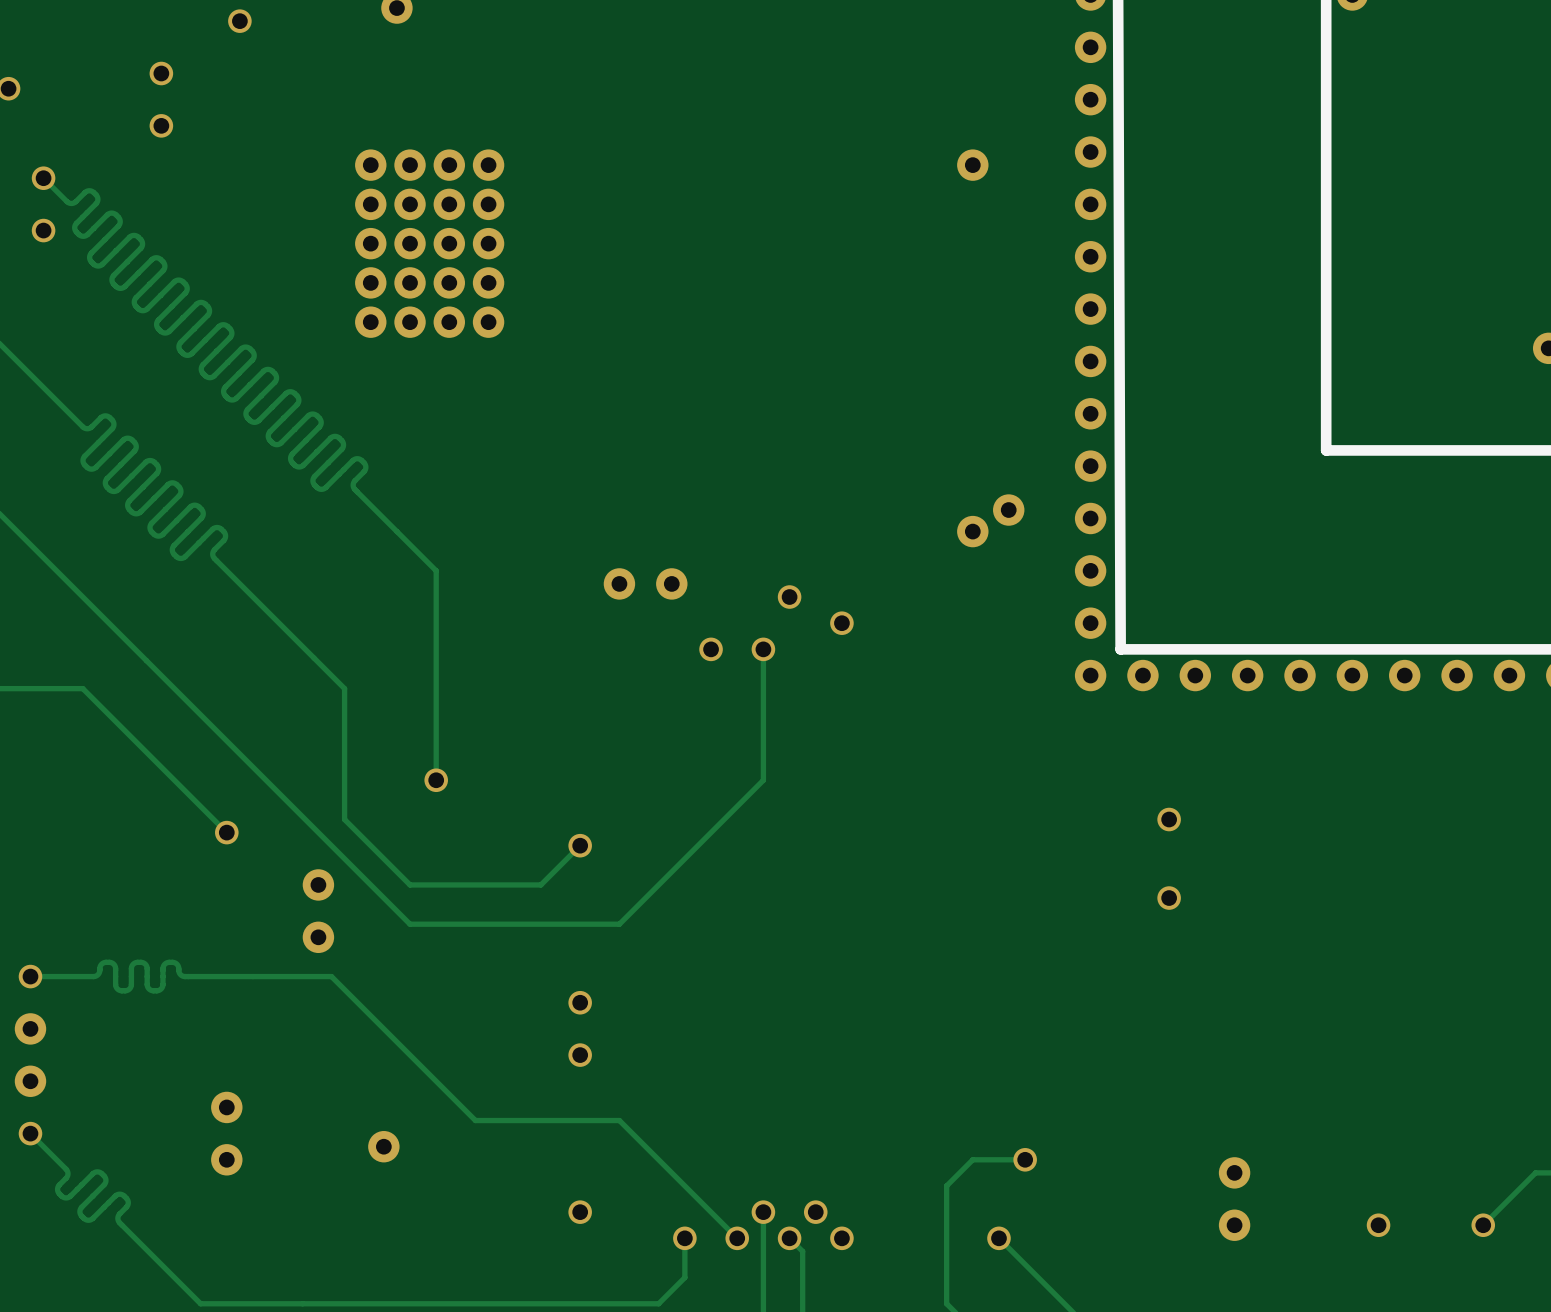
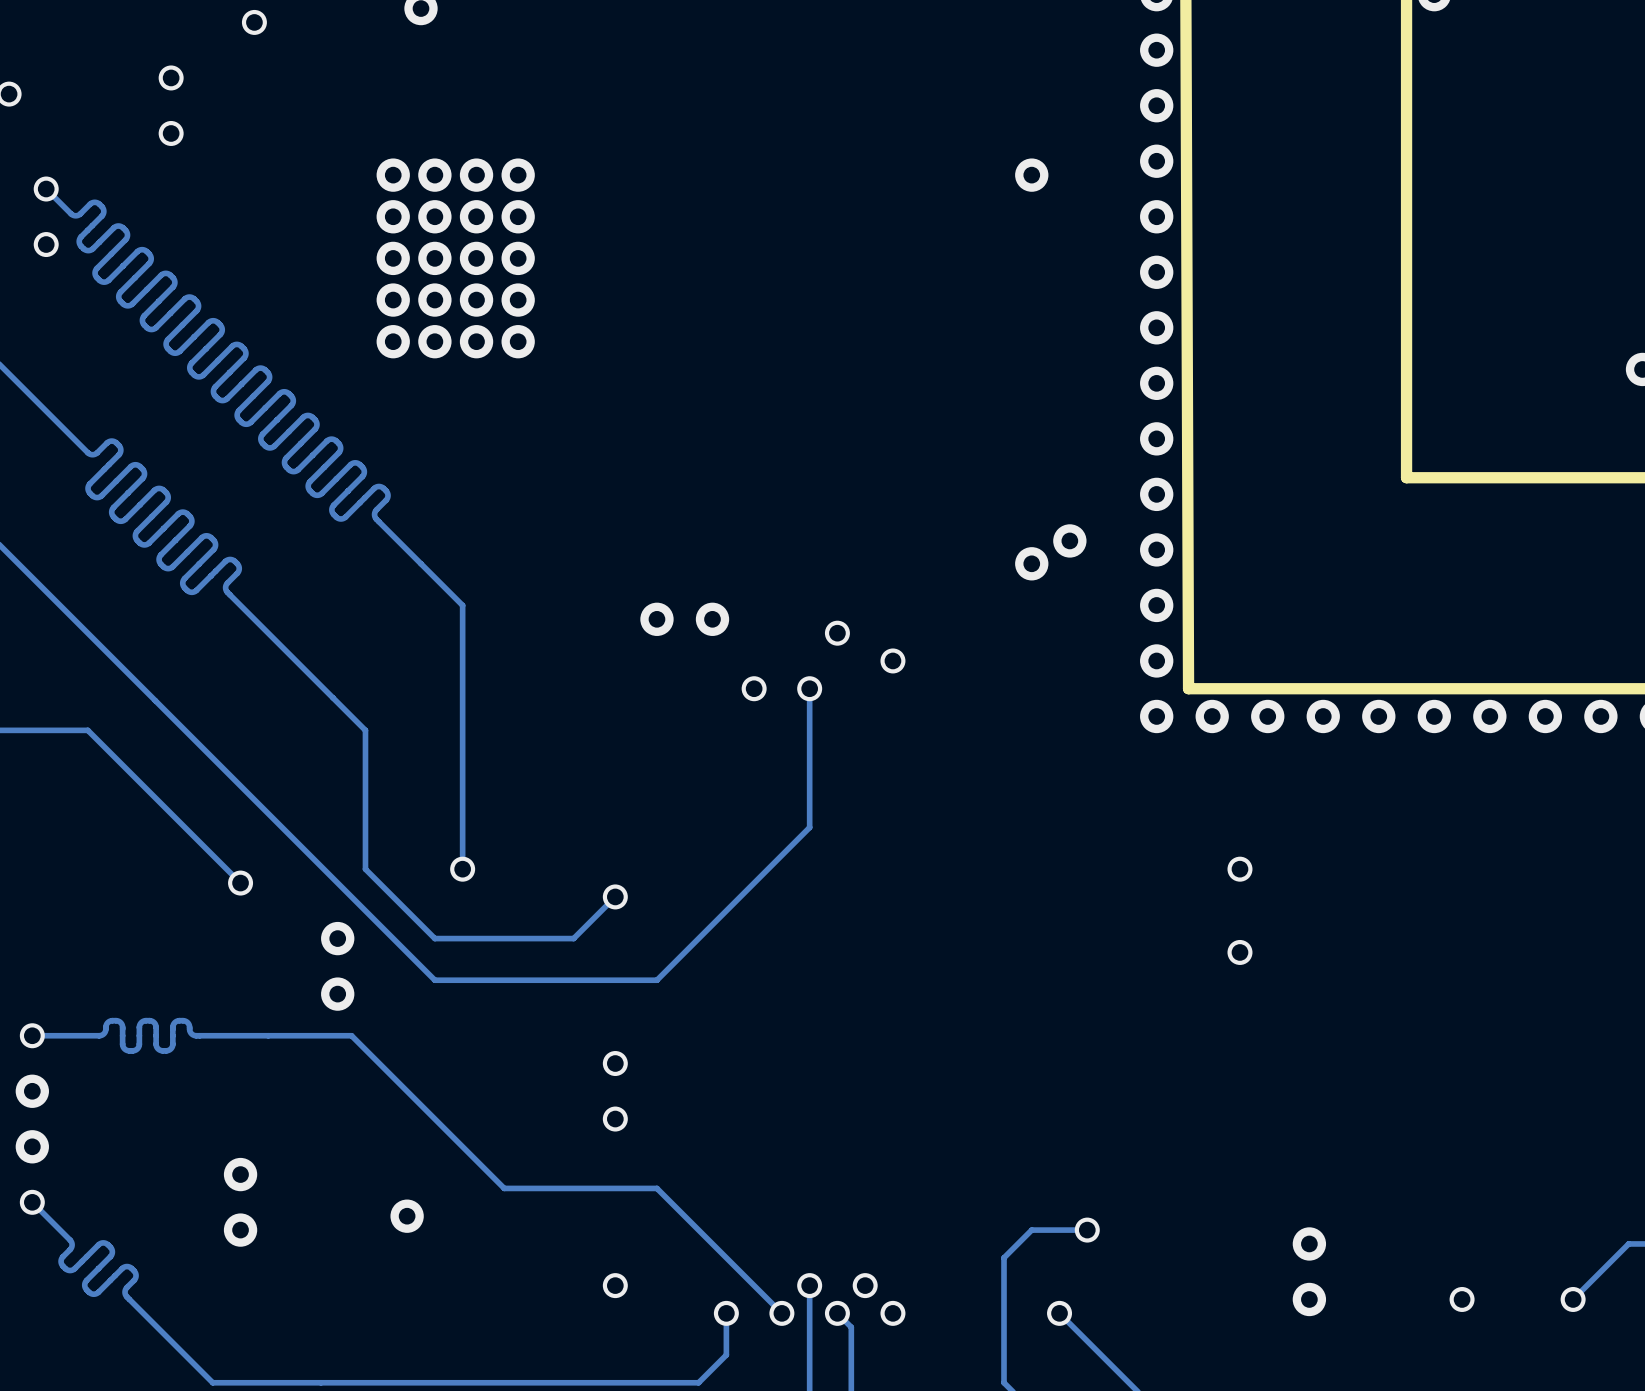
track: none -> (462, 827) (462, 869)
via position: (436, 780) -> (462, 869)

